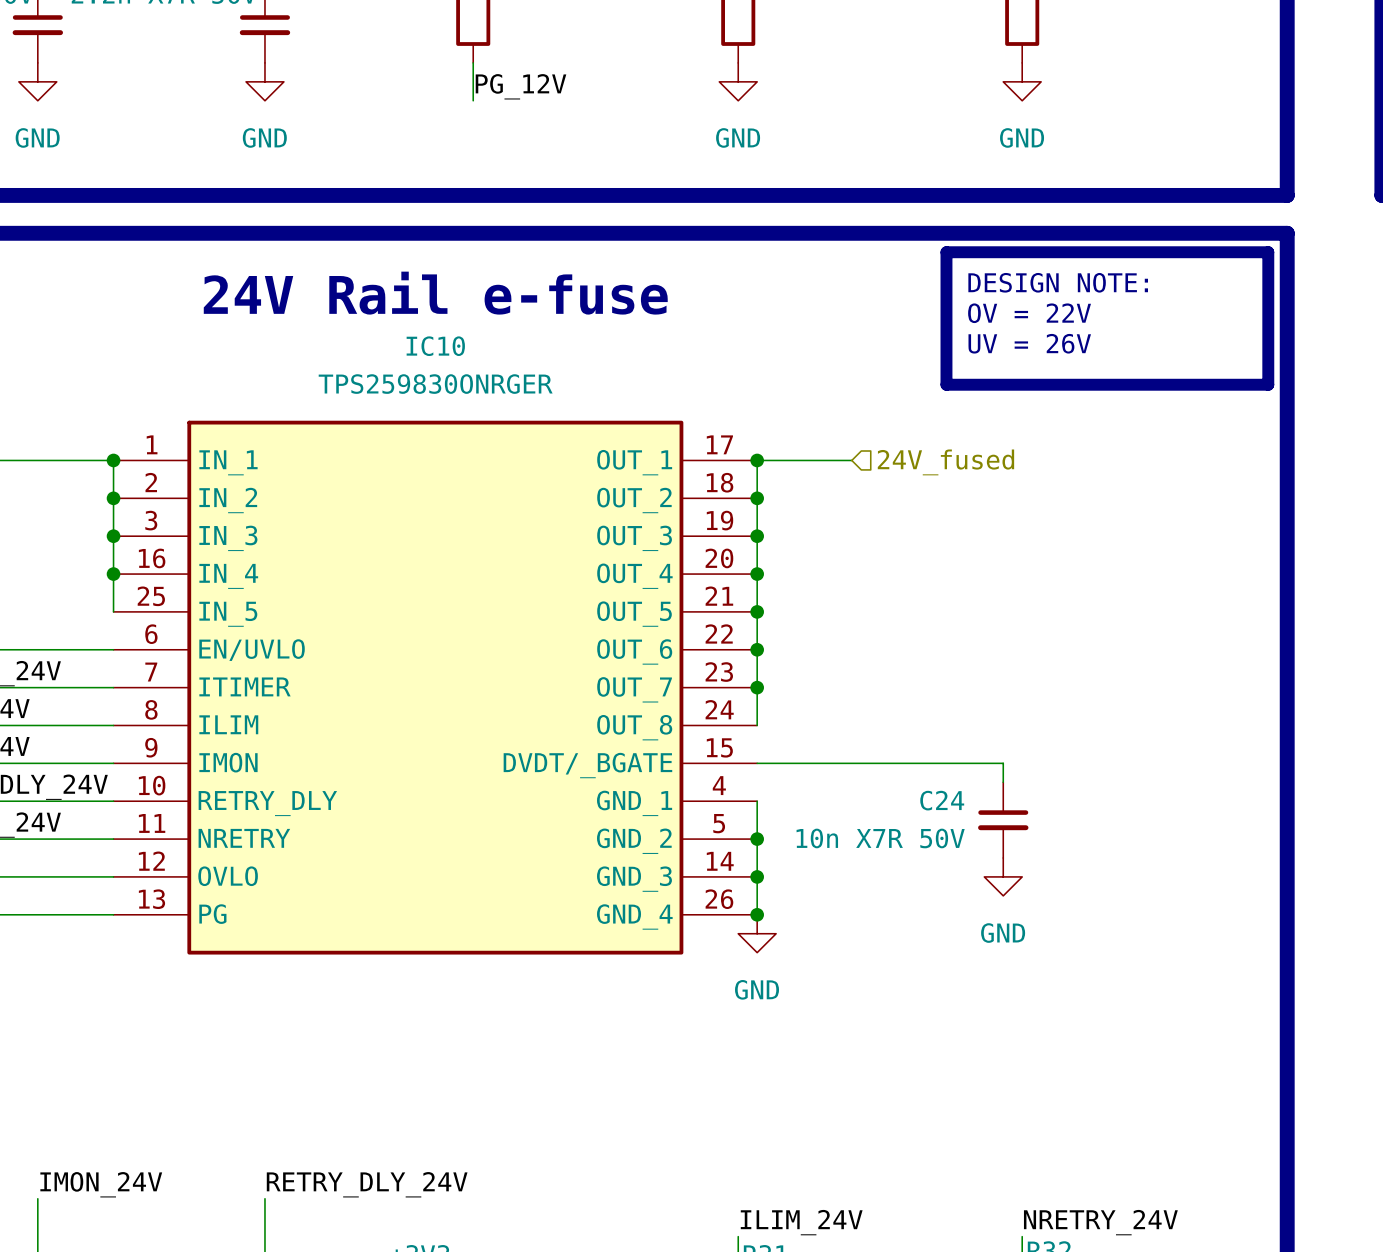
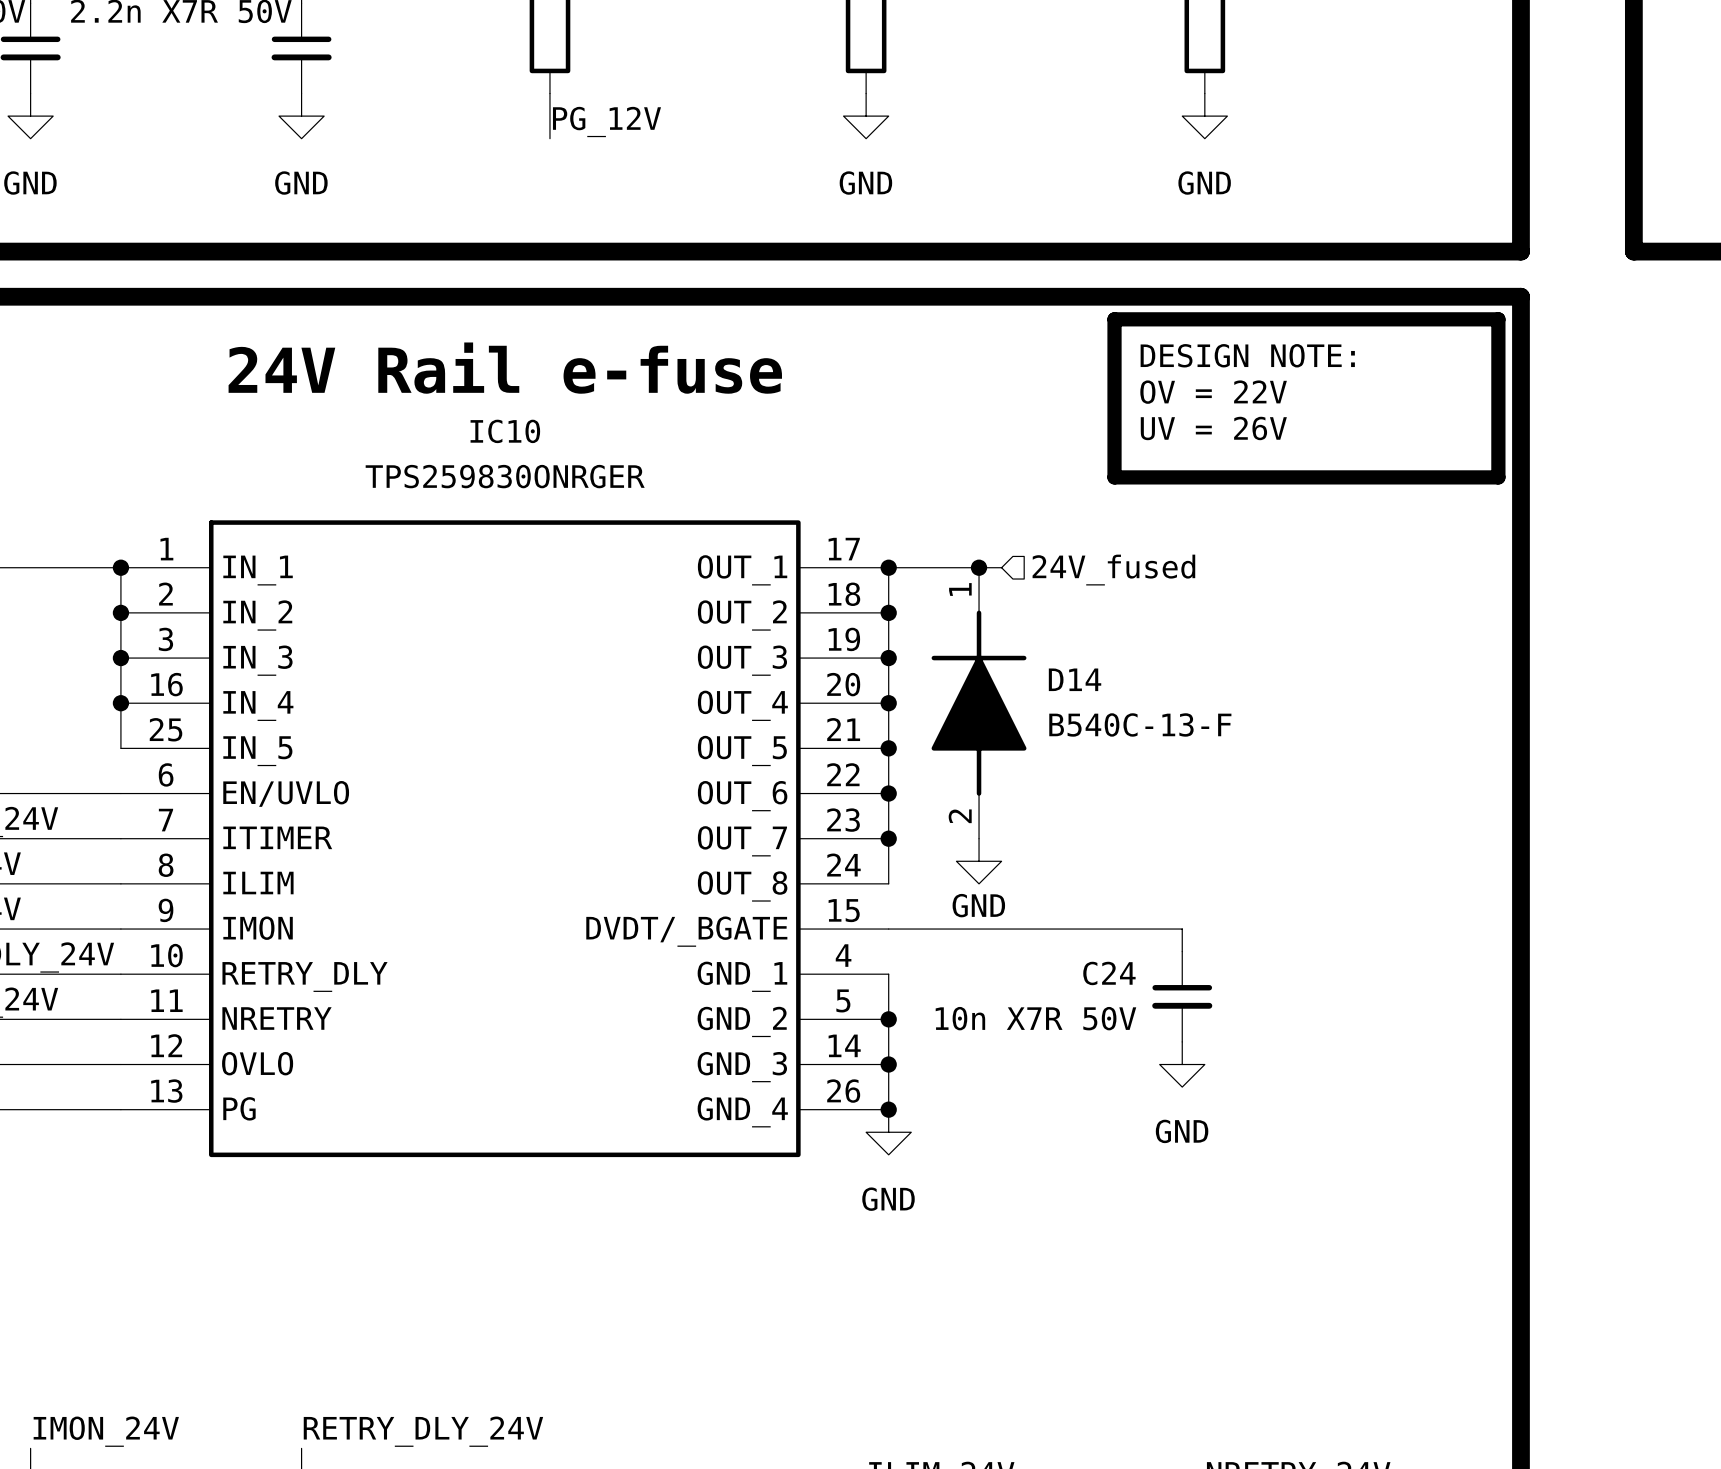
junction: none -> (979, 567)
D14: none -> B540C-13-F (979, 703)
power symbol: none -> GND (979, 861)

